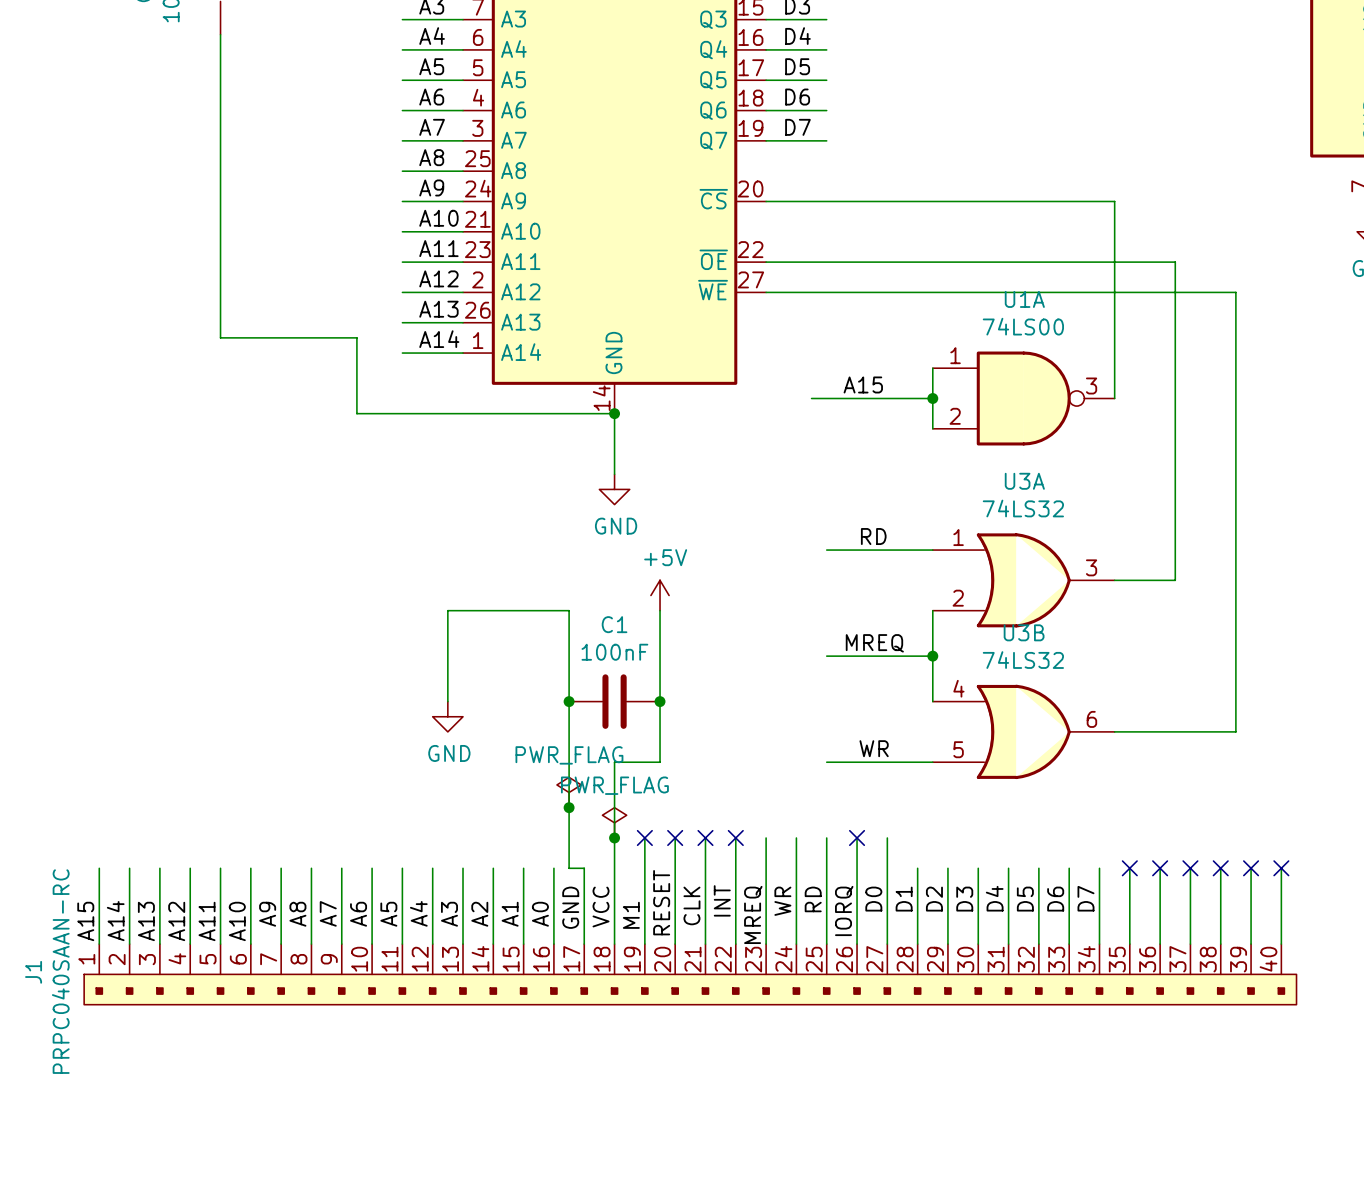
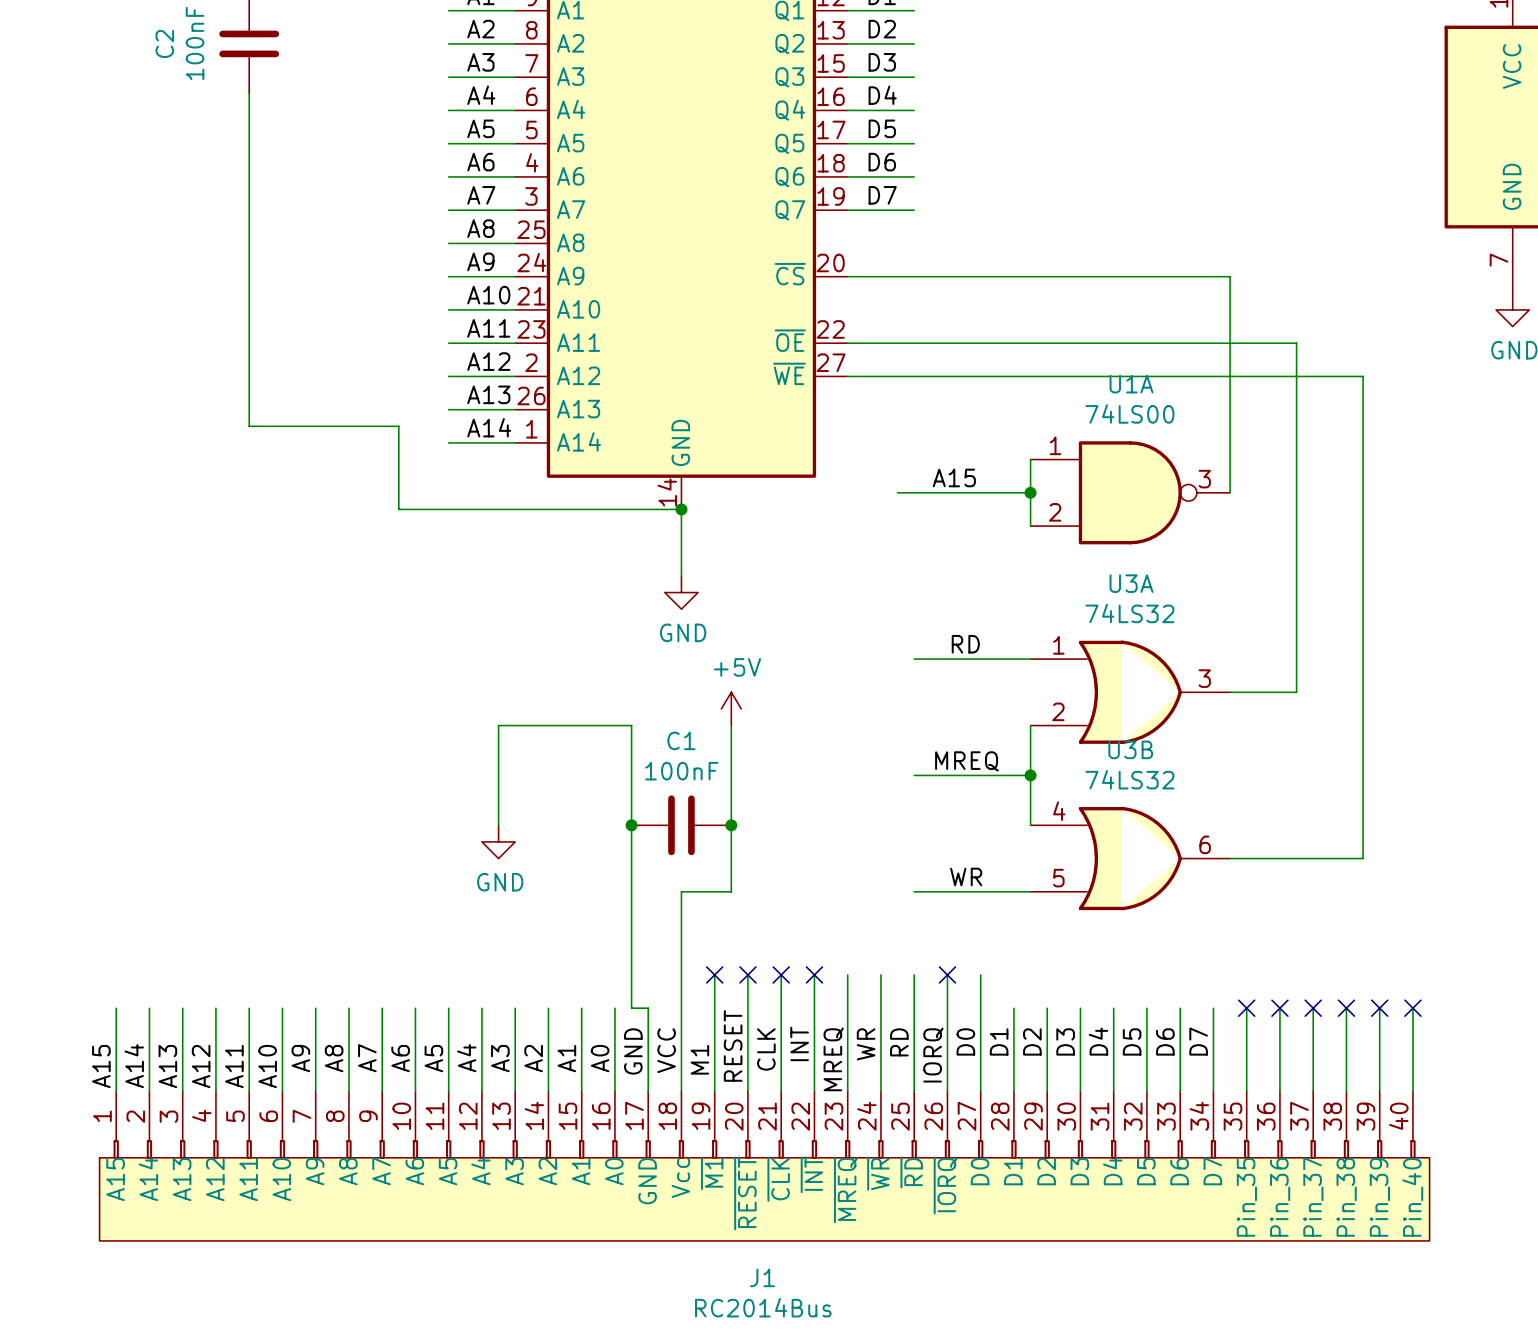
power symbol: PWR_FLAG (569, 792) -> none
junction: (569, 807) -> none
power symbol: PWR_FLAG (614, 822) -> none
junction: (614, 837) -> none
J1 symbol: [84, 944, 1297, 1005] -> [99, 1091, 1430, 1241]
J1 value: PRPC040SAAN-RC (60, 971) -> RC2014Bus (763, 1307)
J1 name position: J1 (33, 972) -> J1 (762, 1277)

